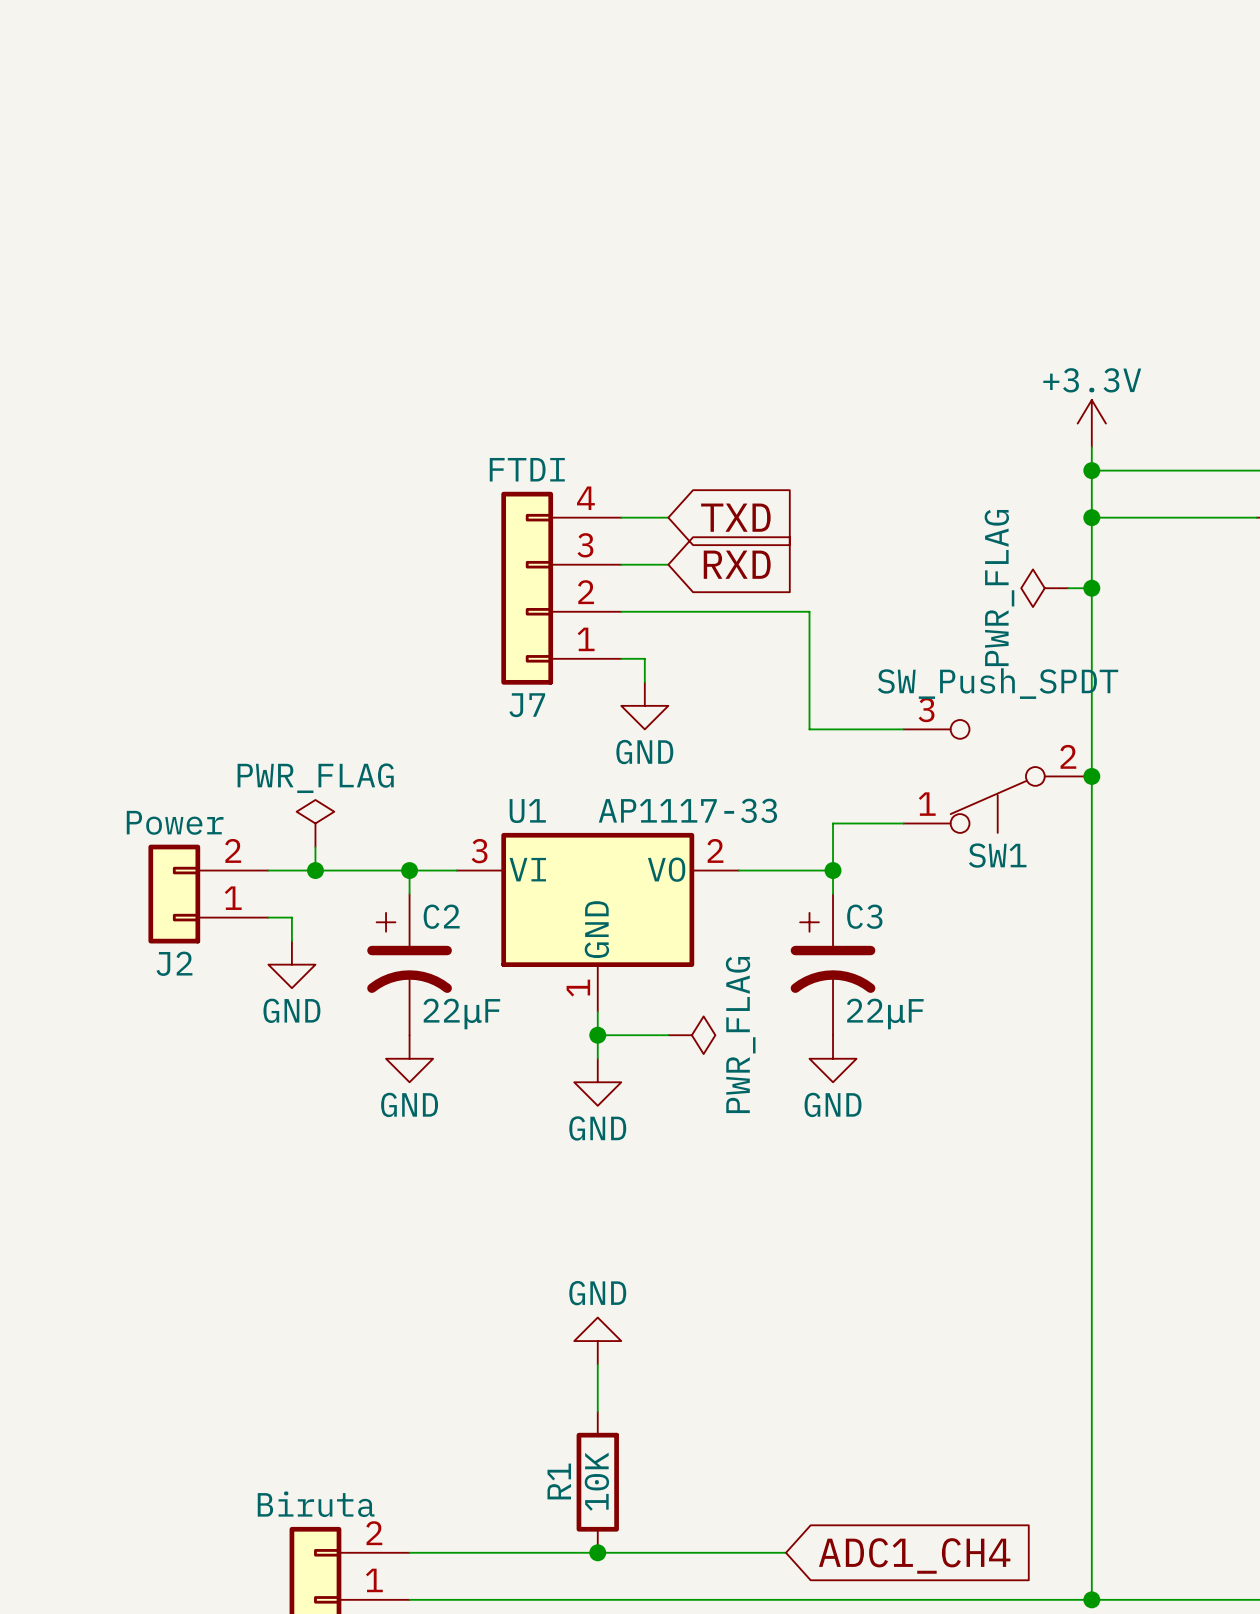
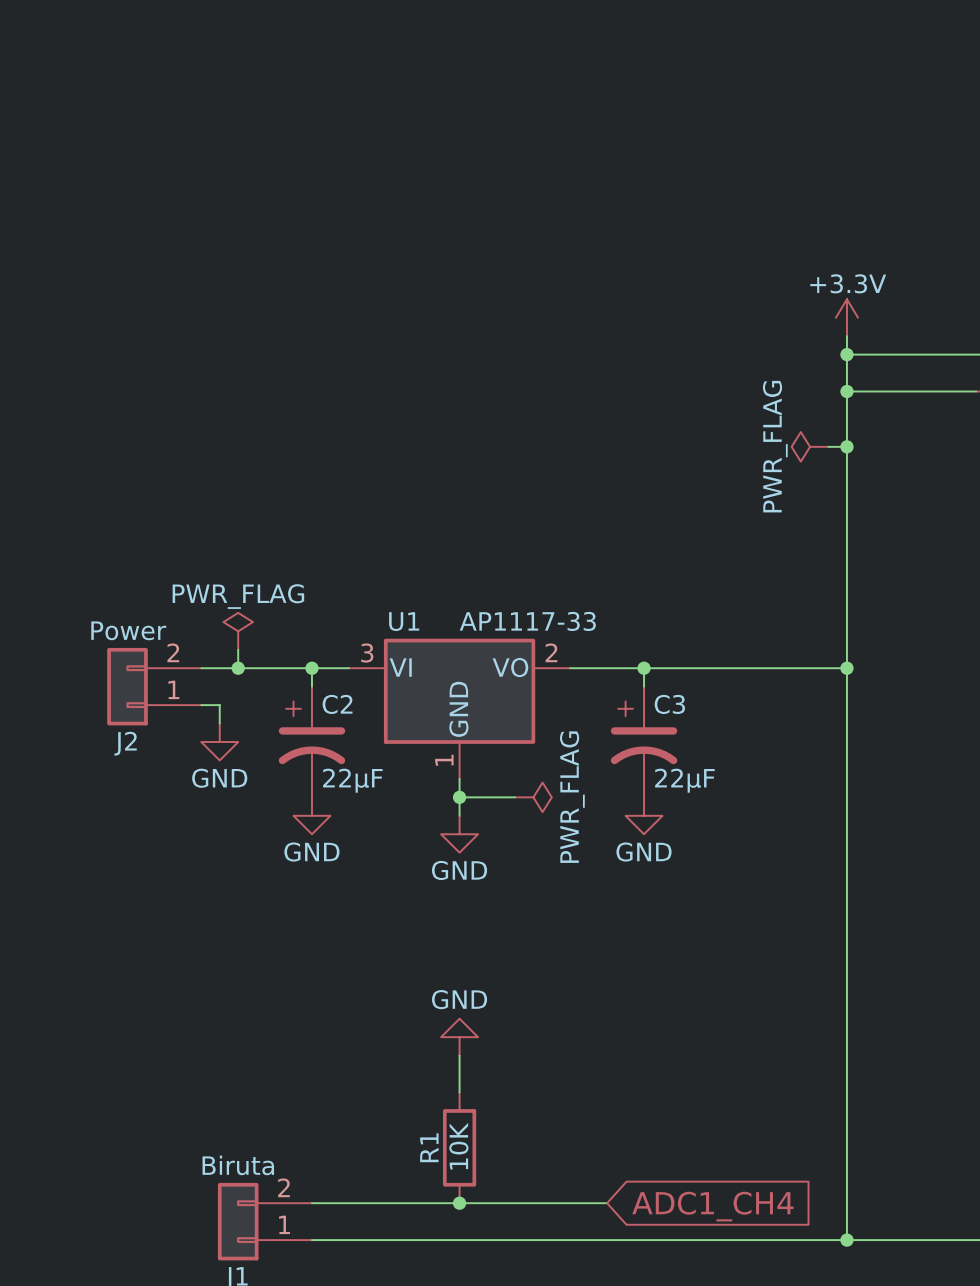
wire: (621, 517) (668, 517) -> none
global label: TXD (735, 517) -> none
wire: (621, 564) (668, 564) -> none
global label: RXD (737, 564) -> none
J7: FTDI (561, 588) -> none
wire: (621, 611) (809, 611) (809, 729) (903, 729) -> none
wire: (621, 658) (644, 658) (644, 682) -> none
power symbol: GND (644, 705) -> none
SW1: SW_Push_SPDT (997, 776) -> none
junction position: (1091, 776) -> (846, 668)
wire: (903, 823) (833, 823) (833, 870) -> (846, 668) (644, 668)

